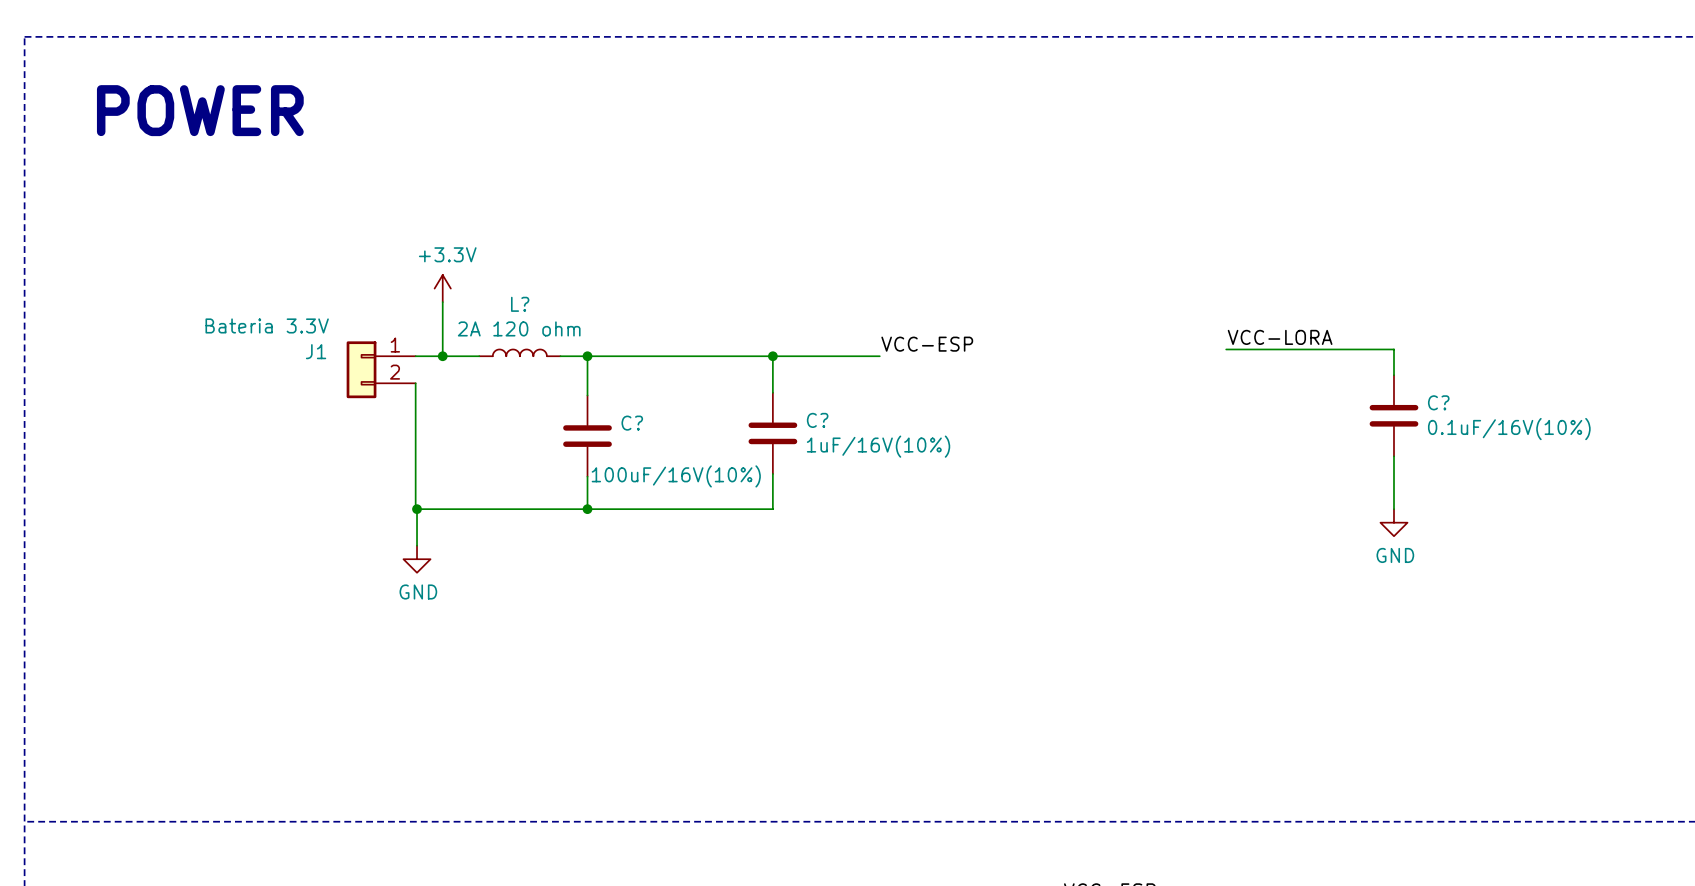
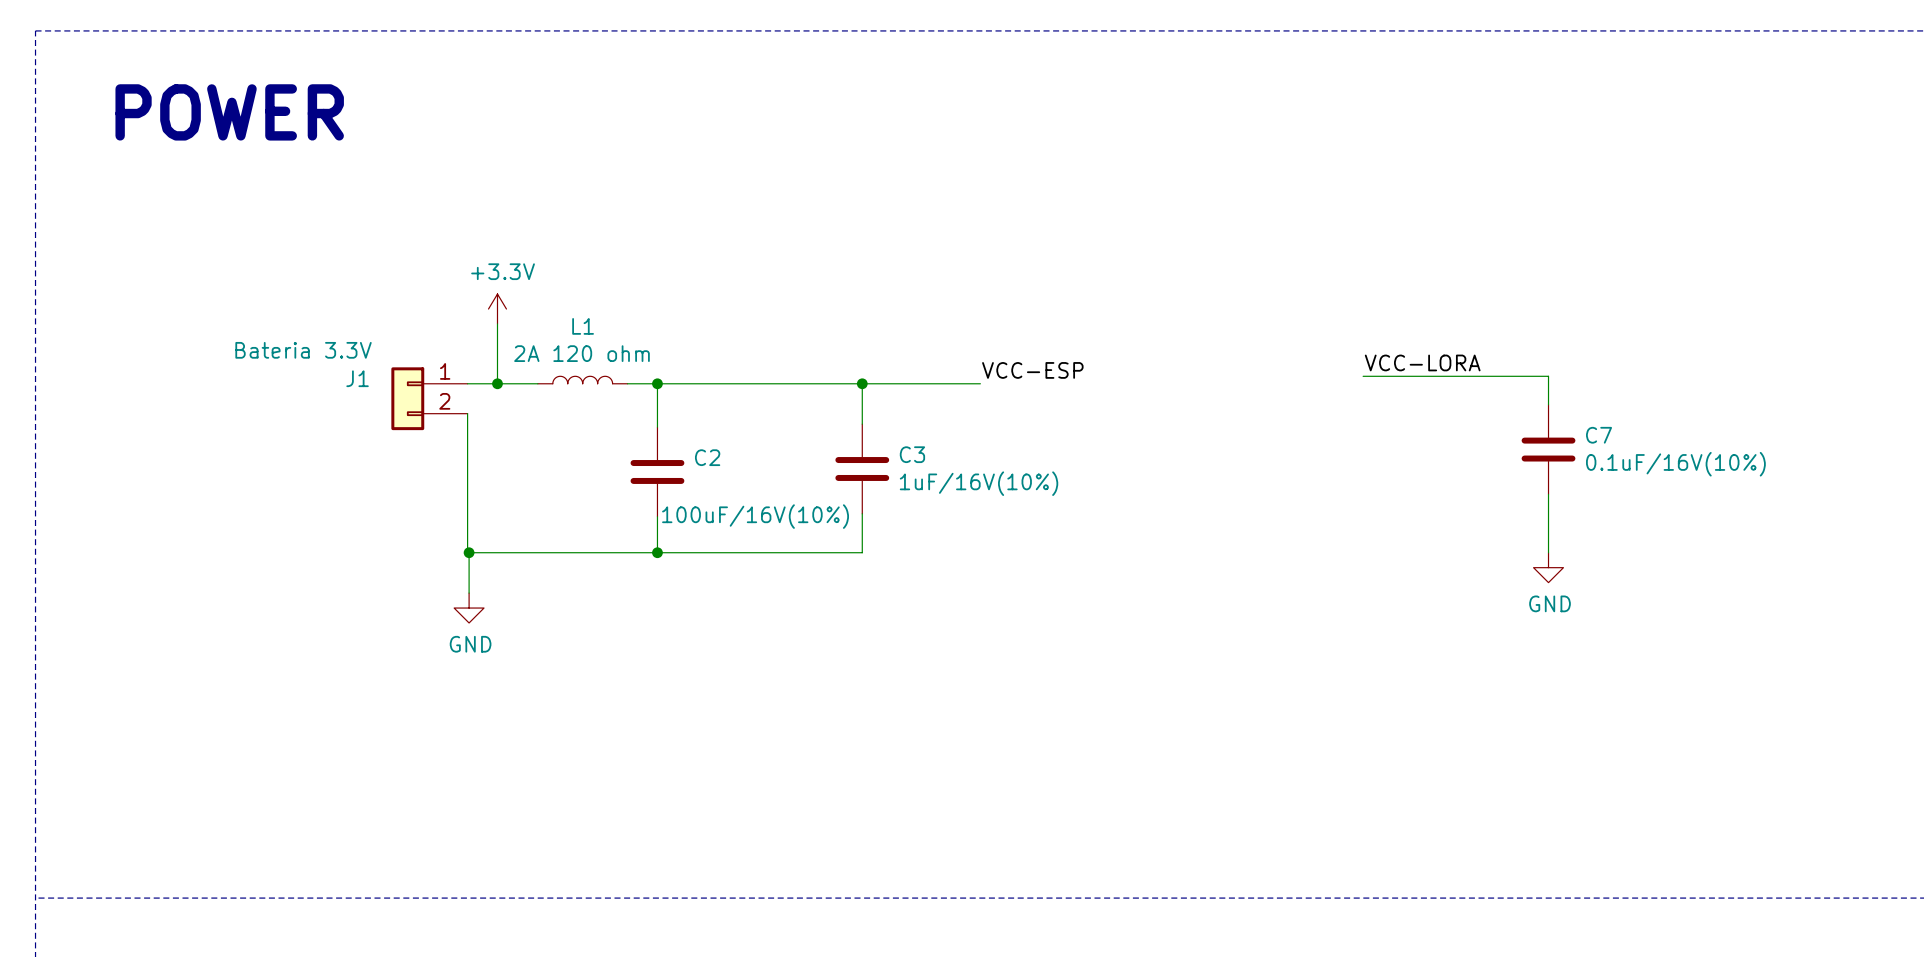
L? name: L? (520, 304) -> L1 (583, 326)
C? name: C? (1438, 402) -> C7 (1599, 435)
C? name: C? (817, 420) -> C3 (912, 454)
C? name: C? (632, 423) -> C2 (707, 457)

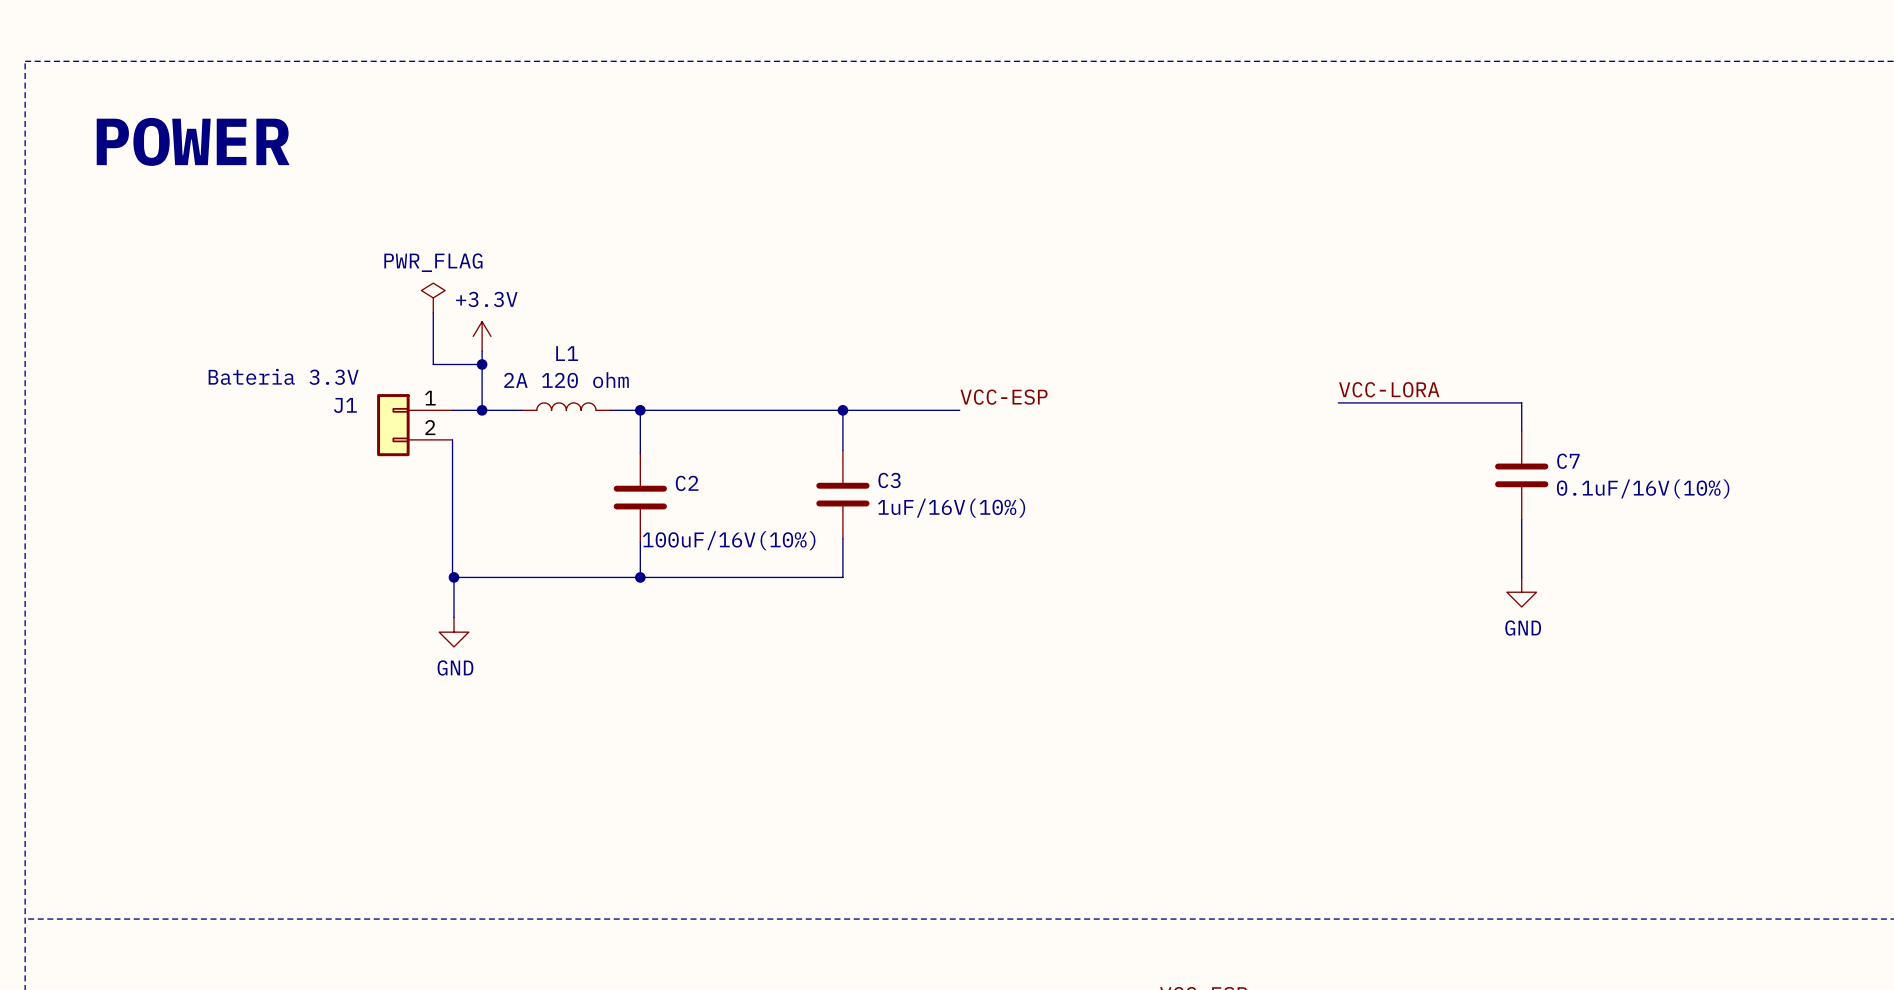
power symbol: none -> PWR_FLAG (433, 297)
wire: none -> (433, 312) (433, 364) (482, 364)
junction: none -> (482, 364)

